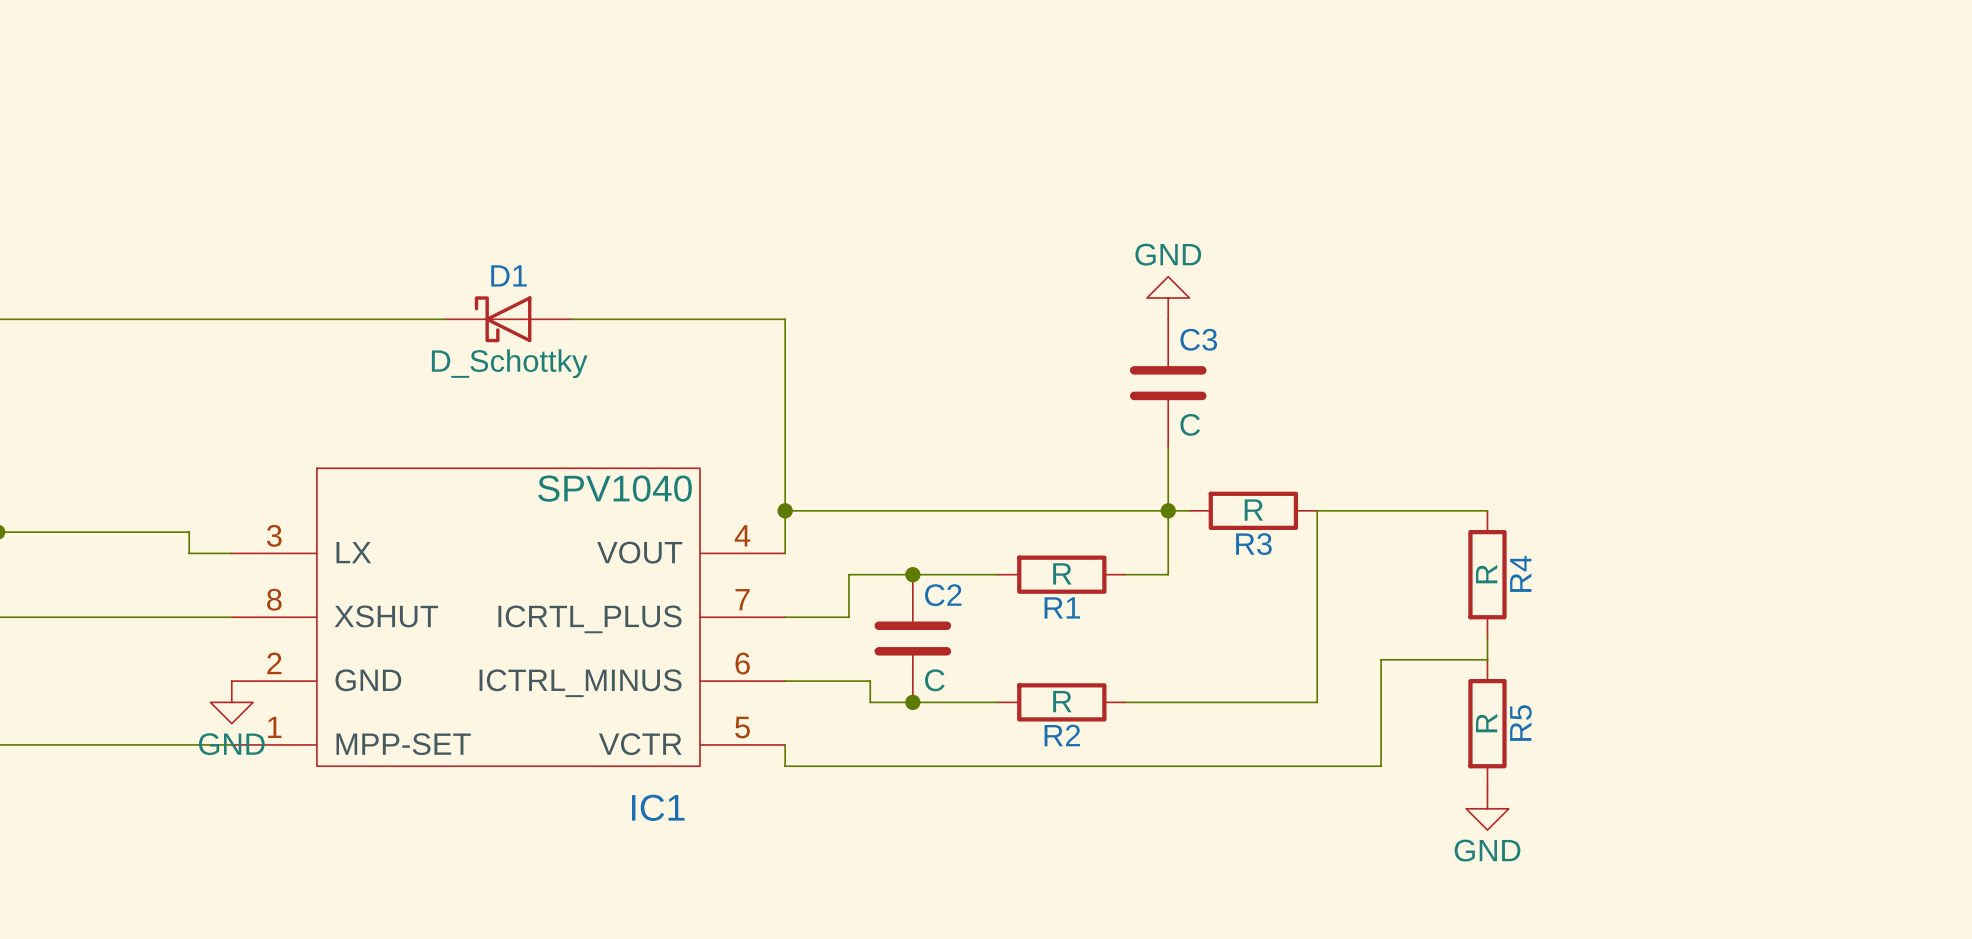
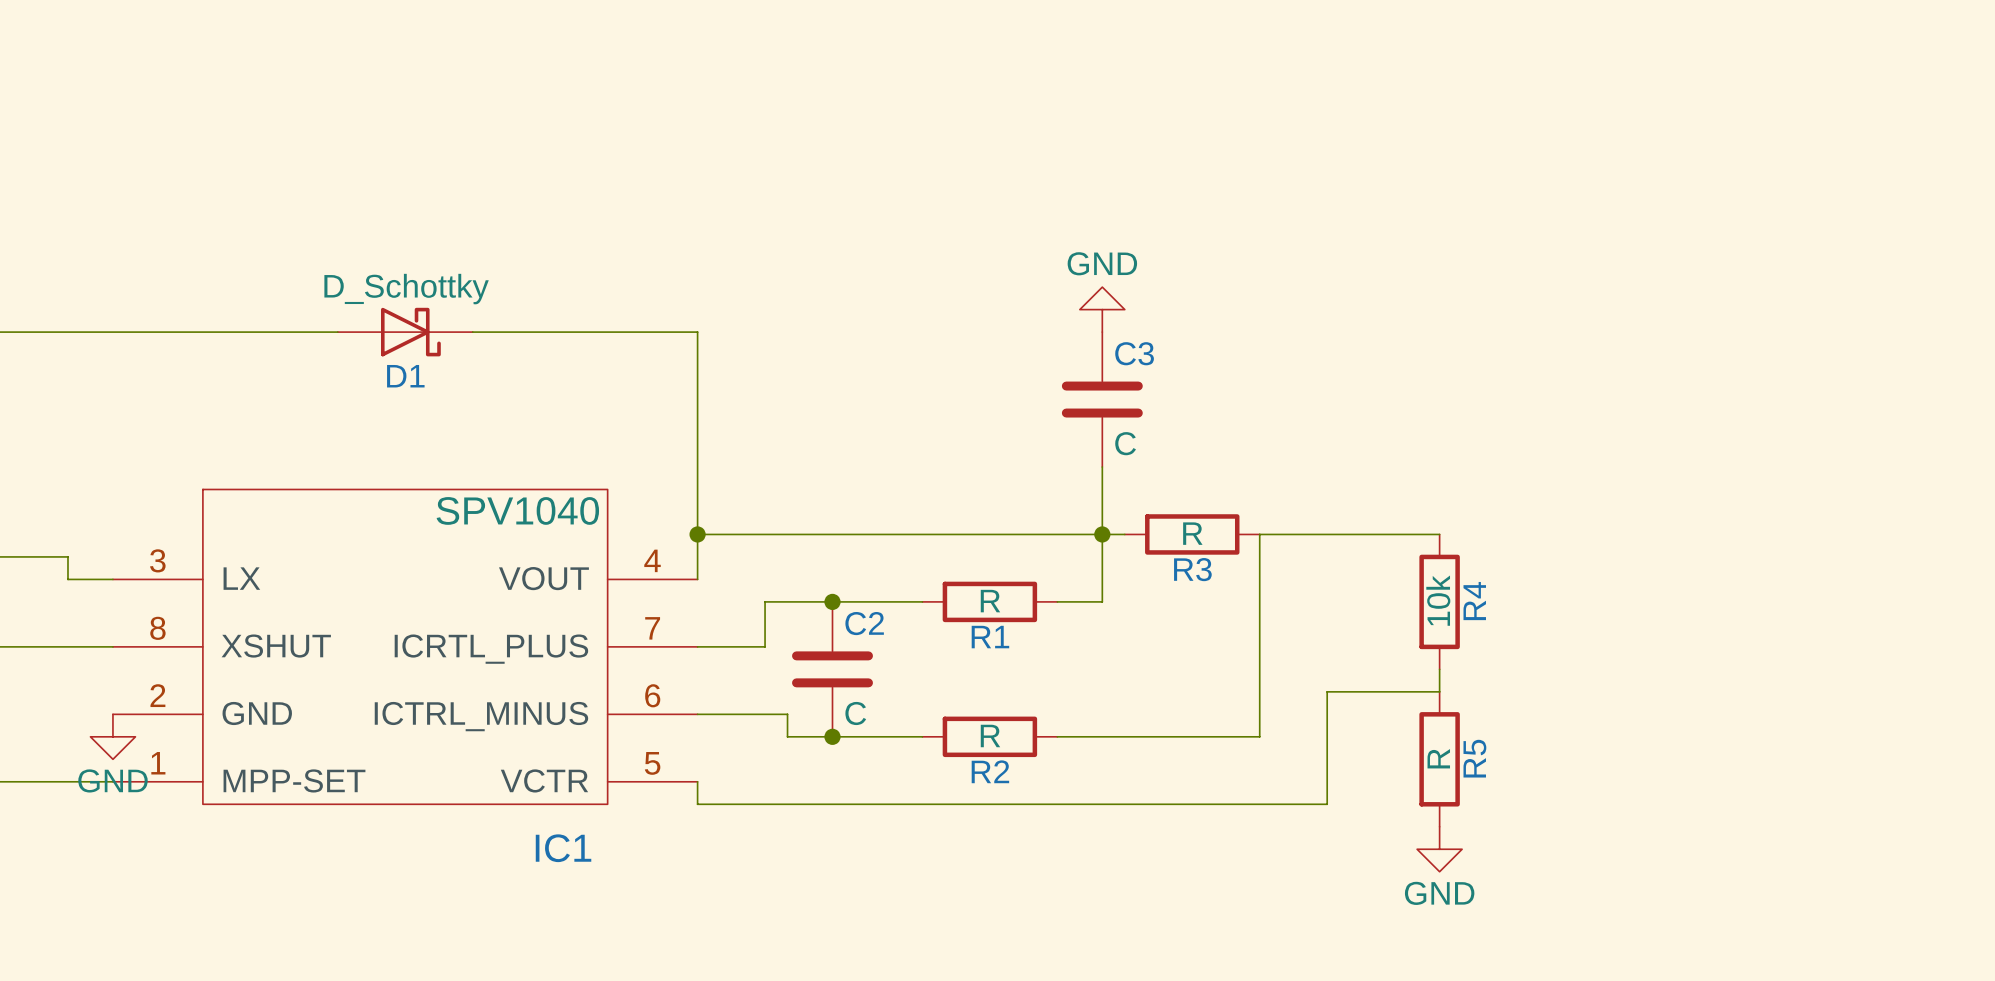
D1 rotation: 0° (503, 319) -> 180° (410, 332)
R4 value: R (1486, 574) -> 10k (1438, 600)

